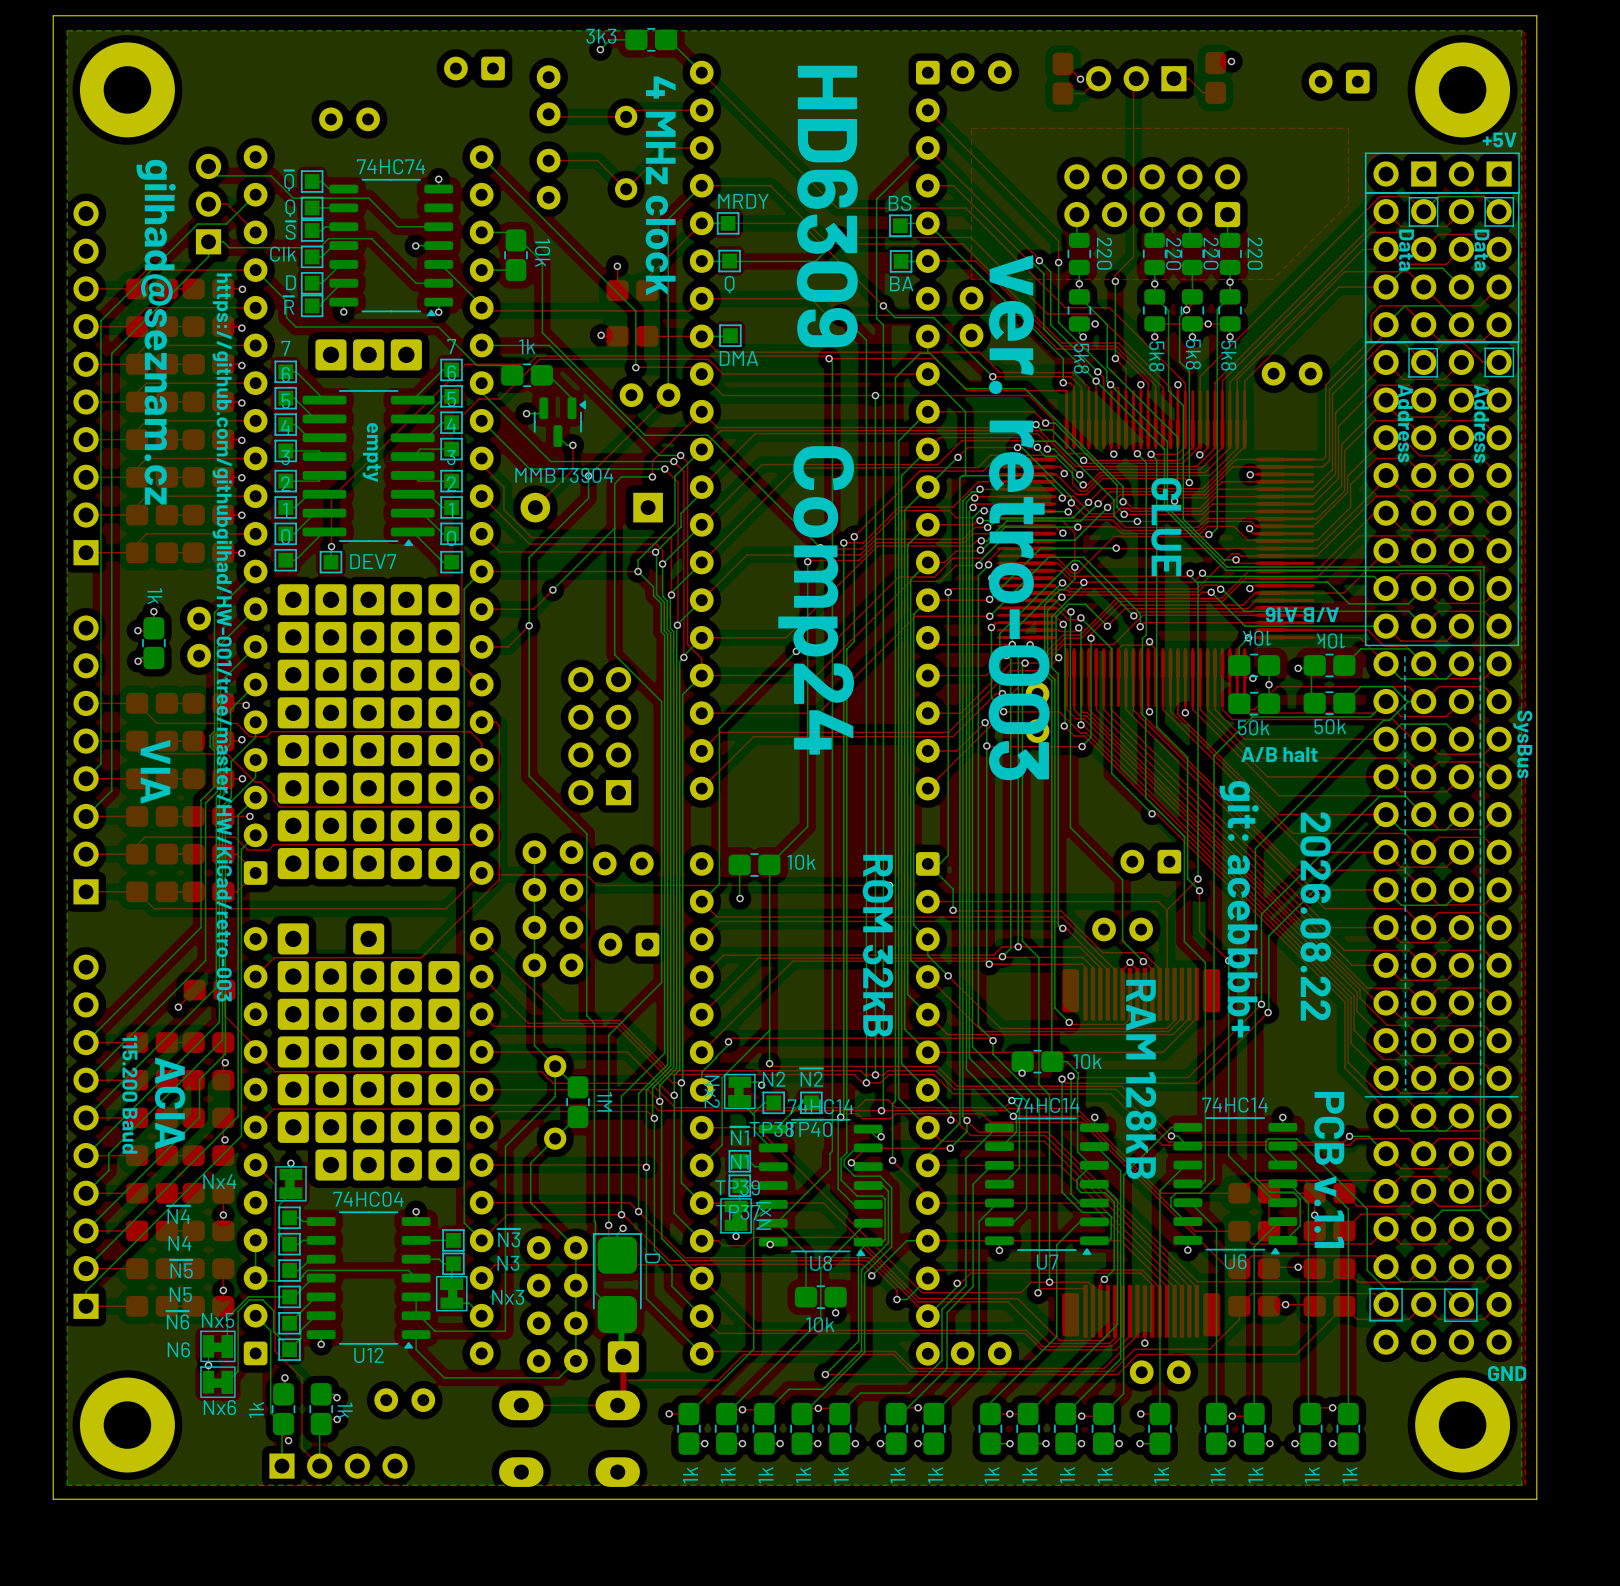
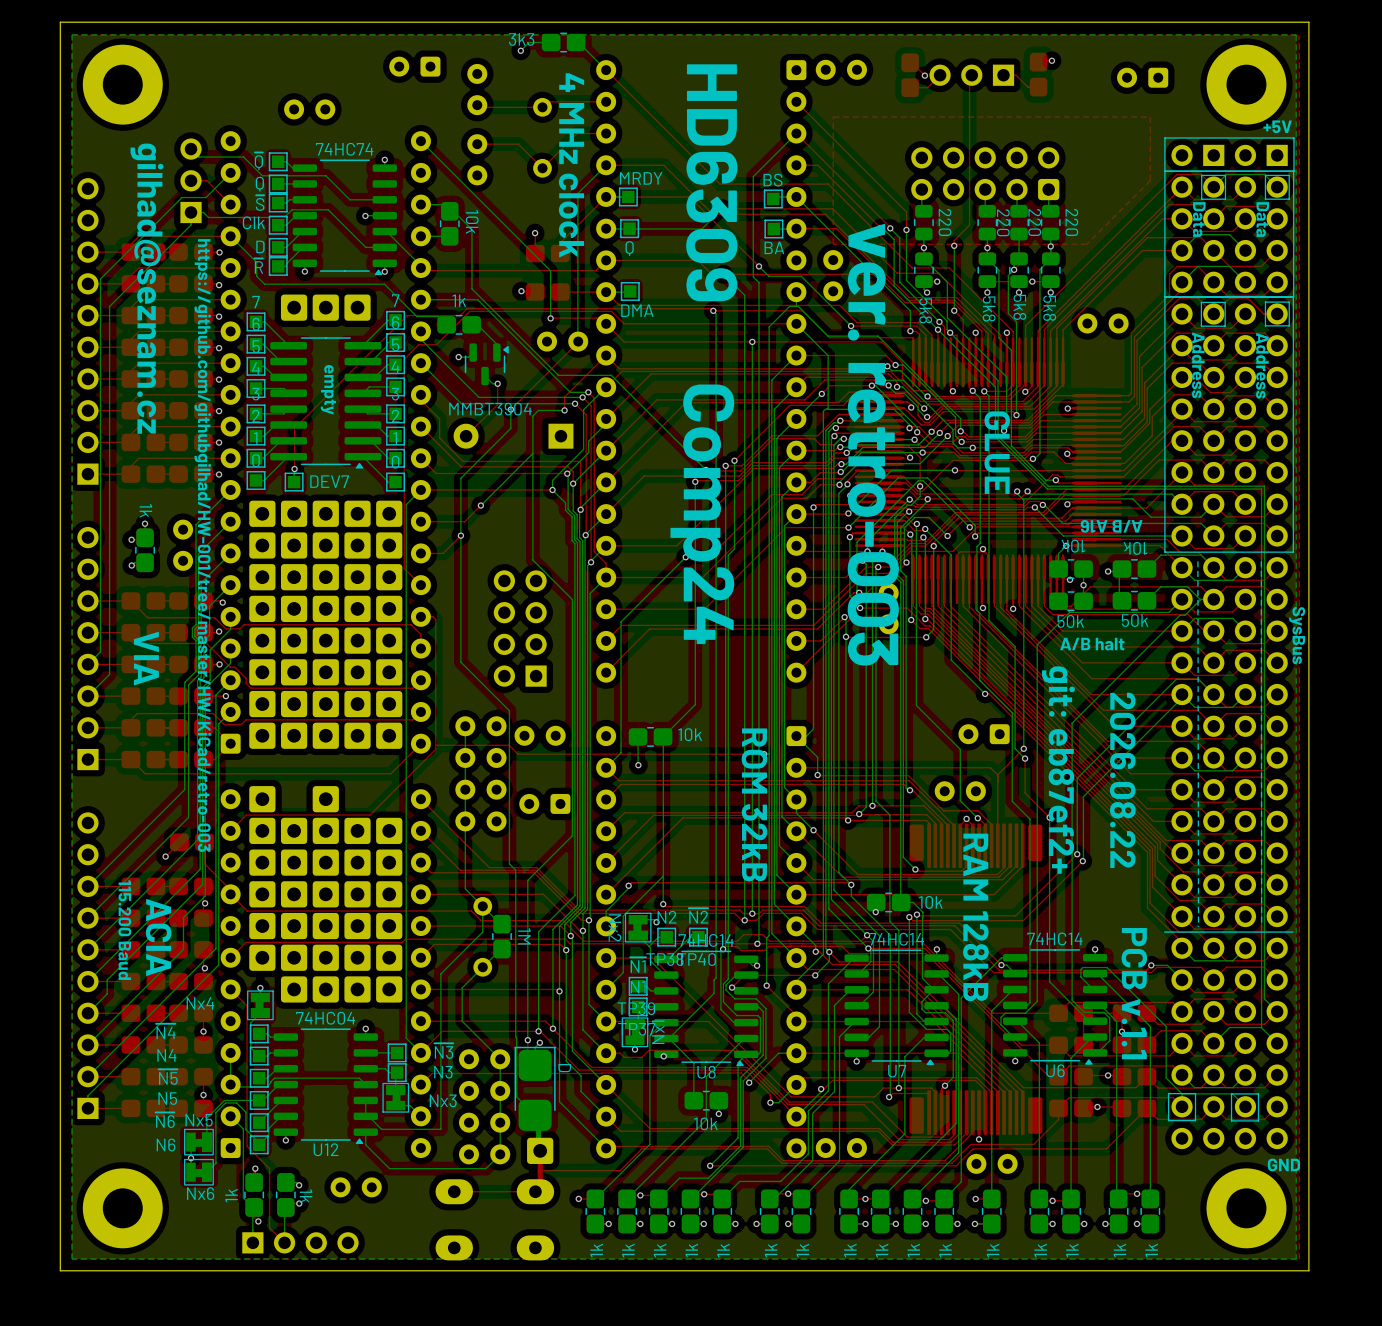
text: git: acebbbb+ (1239, 909) -> git: eb87ef2+ (1058, 770)

